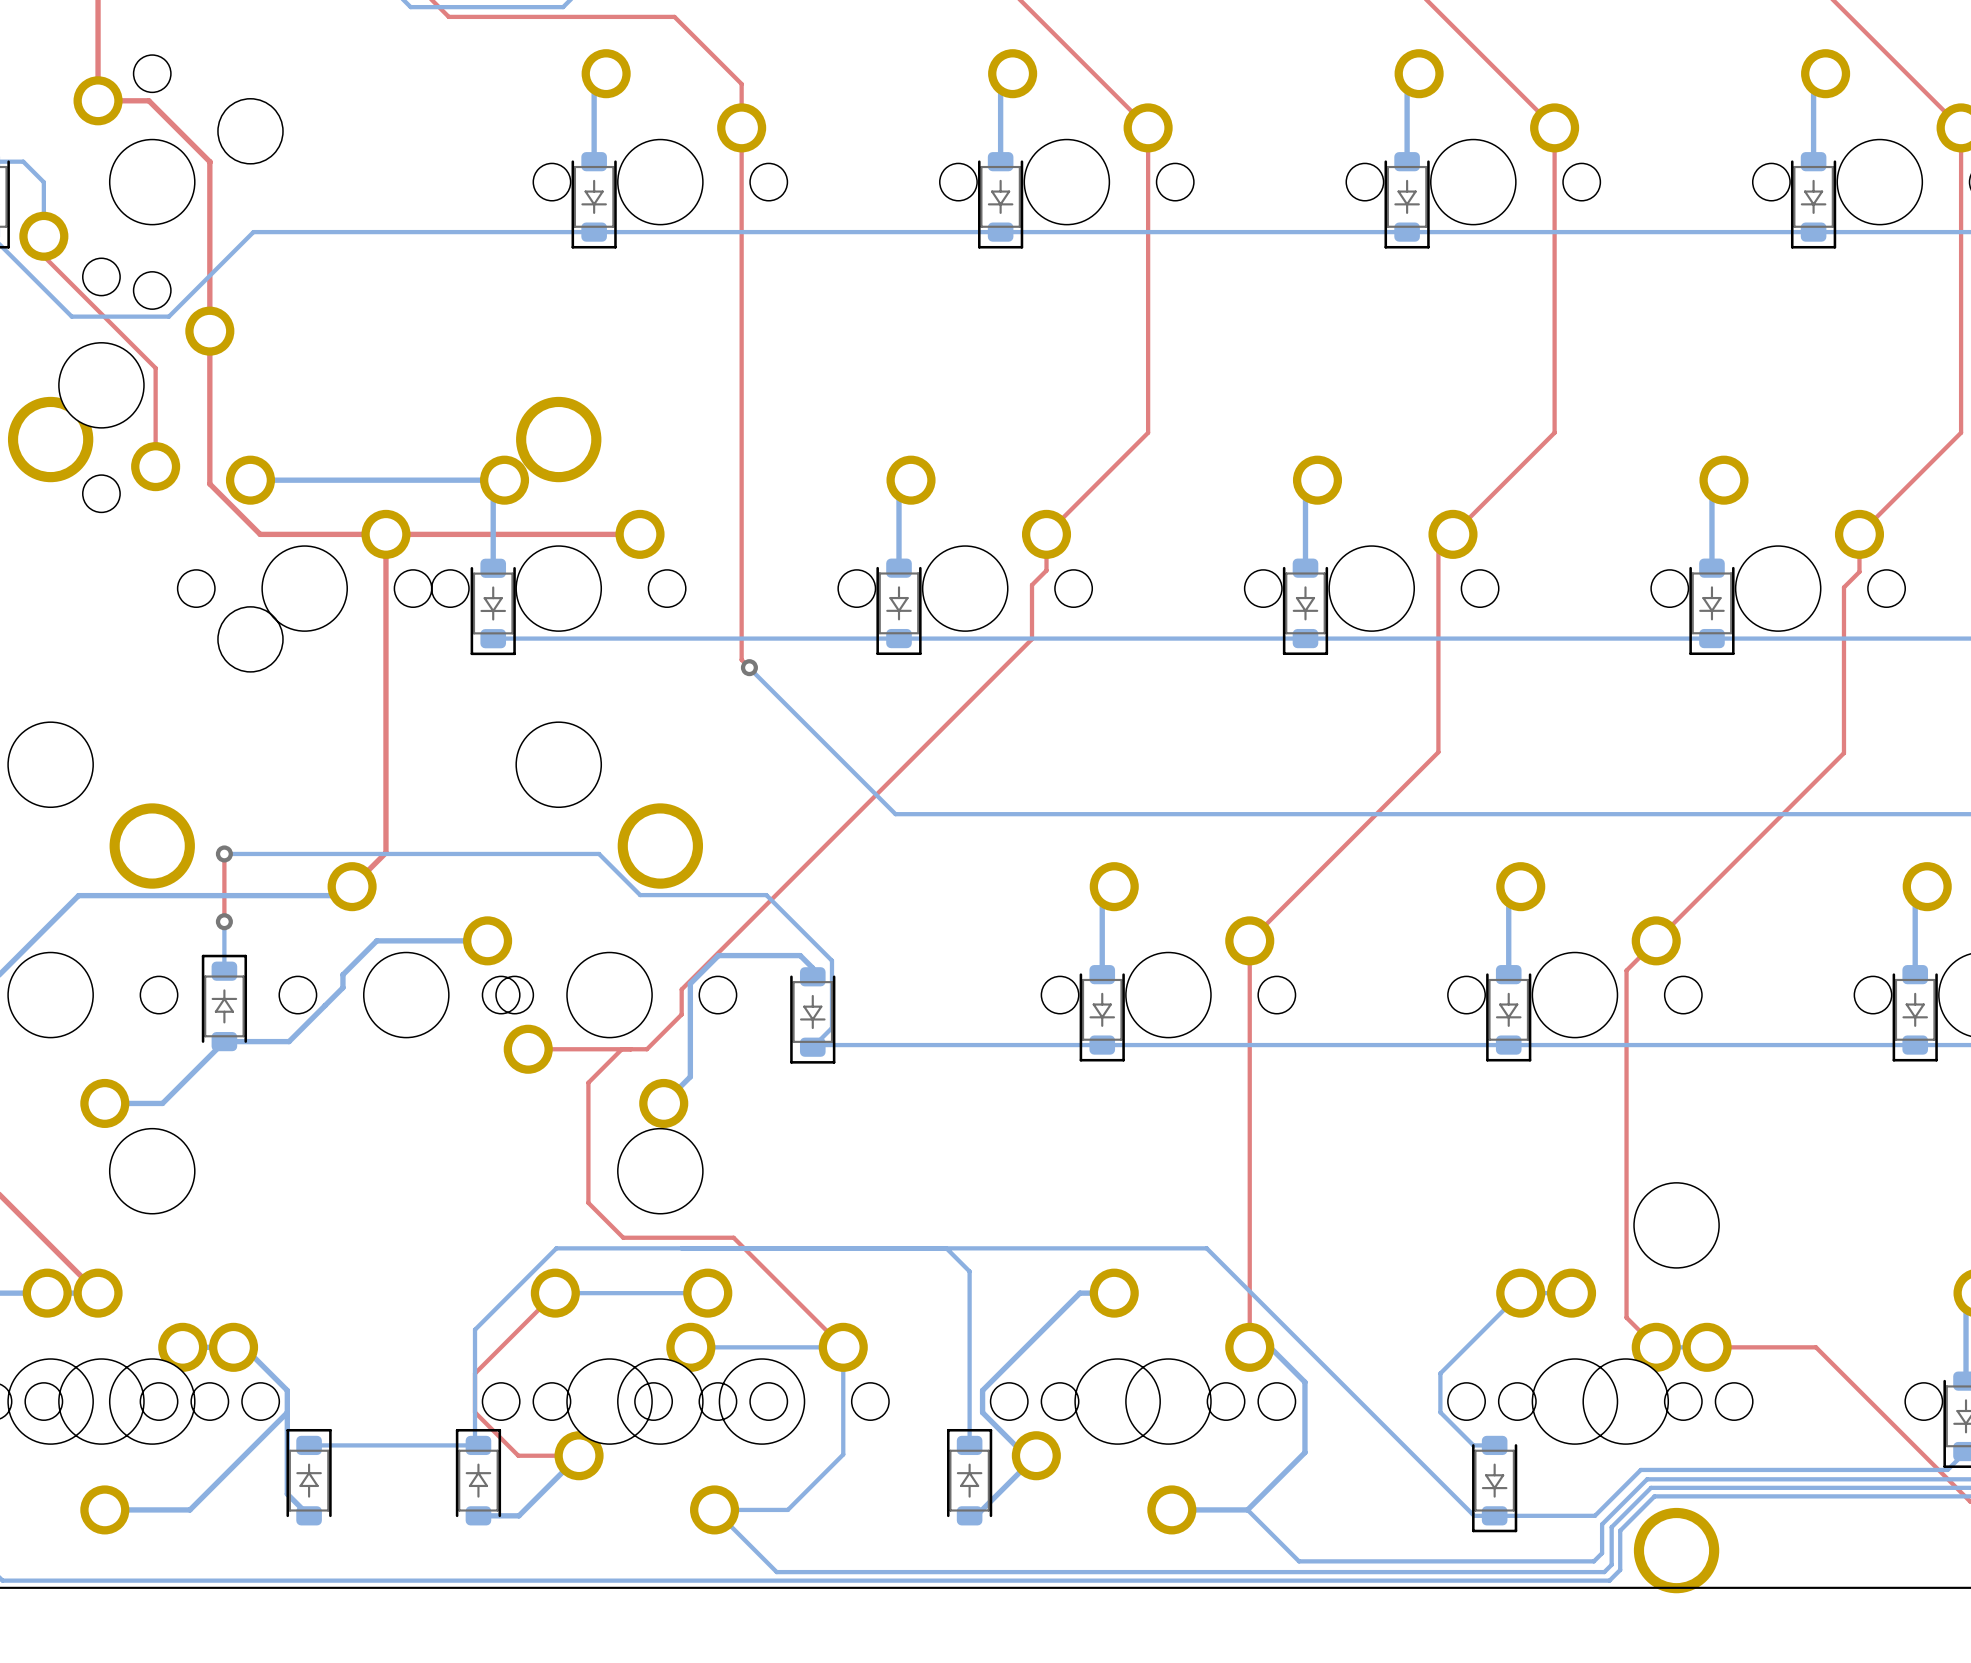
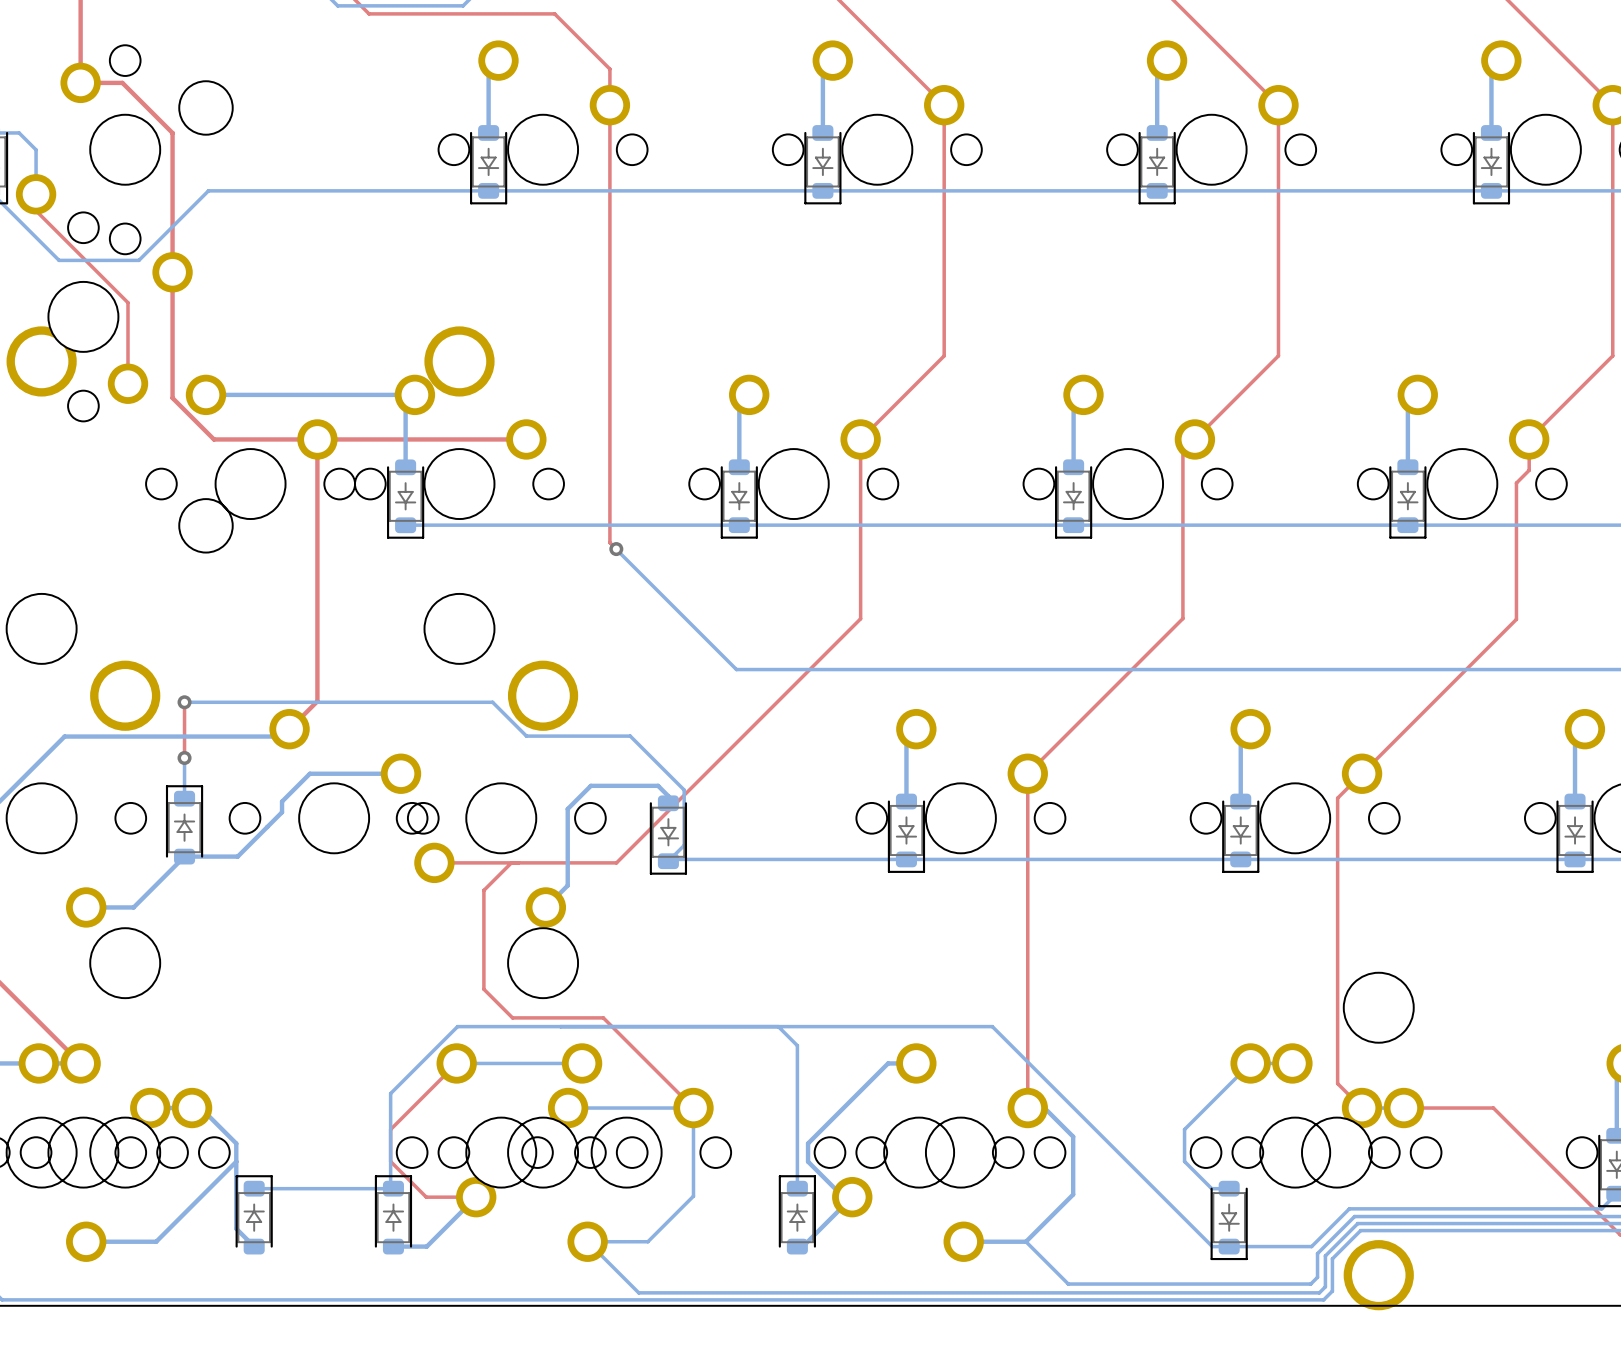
top track: (1046, 570) (1032, 585) (1032, 639) (681, 989) (681, 1014) (646, 1049) -> (860, 469) (860, 618) (616, 862) (532, 862)

